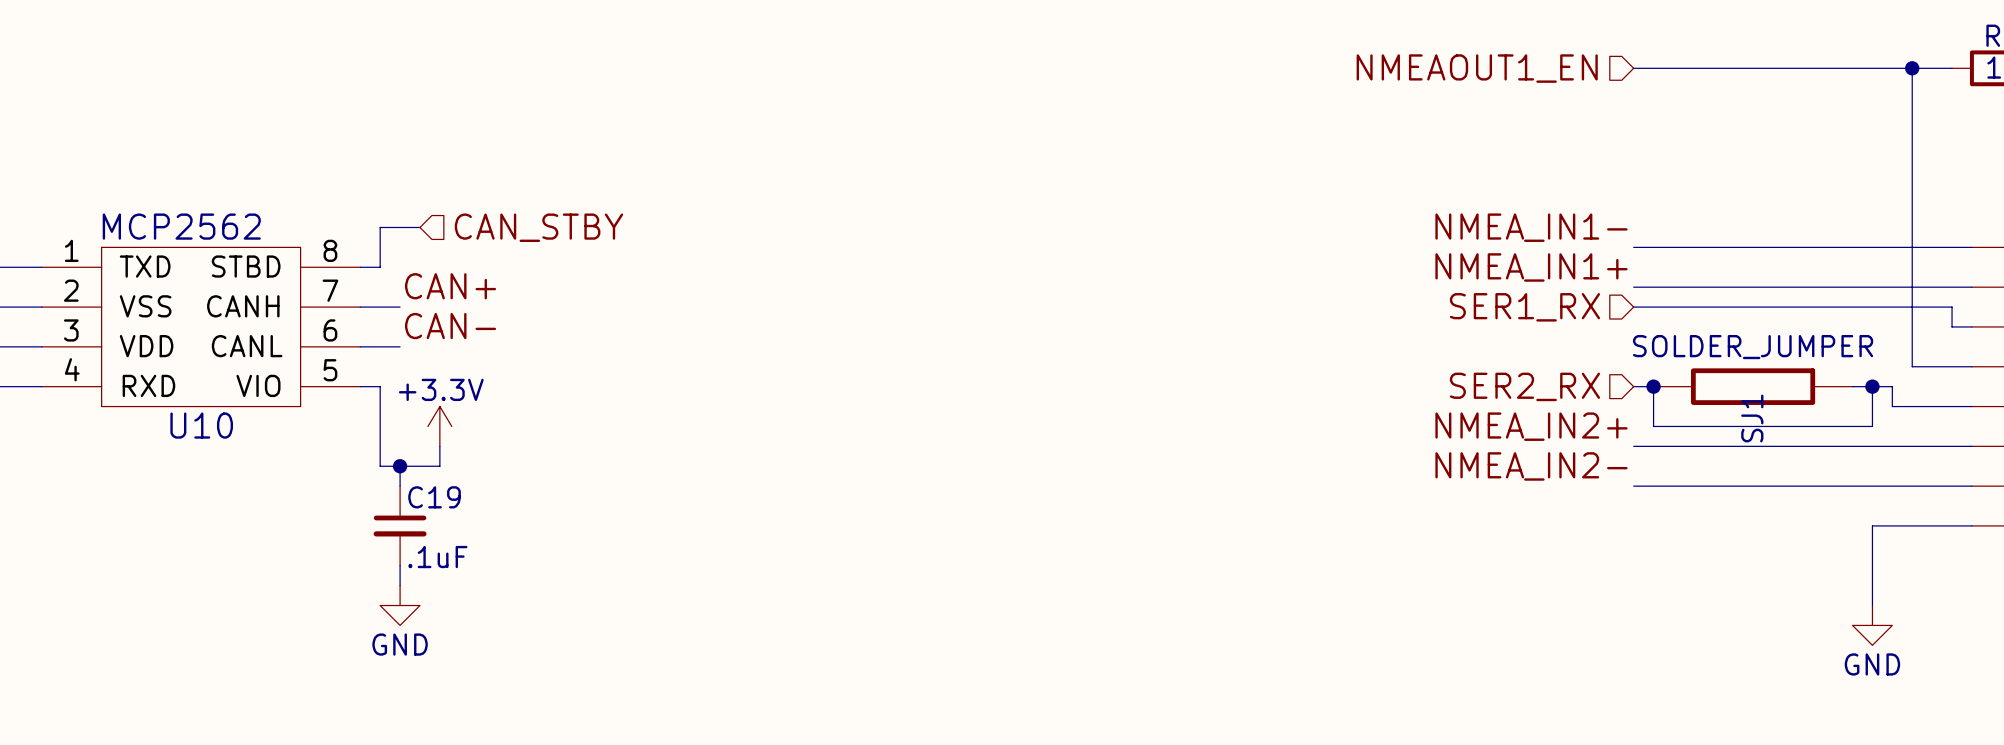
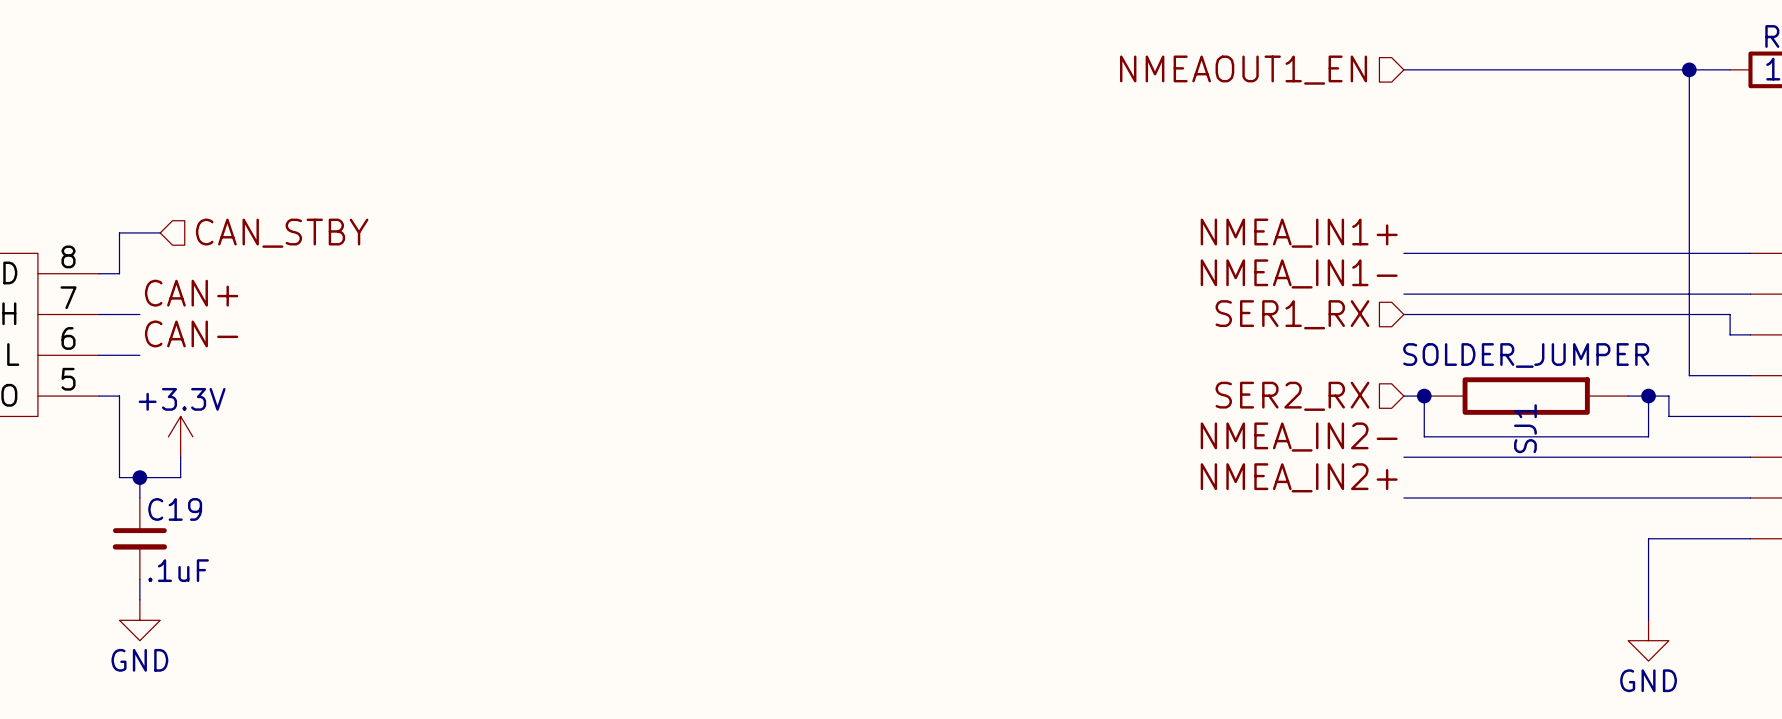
label: NMEA_IN1- (1531, 227) -> NMEA_IN1+ (1299, 233)
label: NMEA_IN1+ (1531, 267) -> NMEA_IN1- (1299, 273)
label: NMEA_IN2+ (1531, 426) -> NMEA_IN2- (1299, 437)
label: NMEA_IN2- (1531, 466) -> NMEA_IN2+ (1299, 477)

